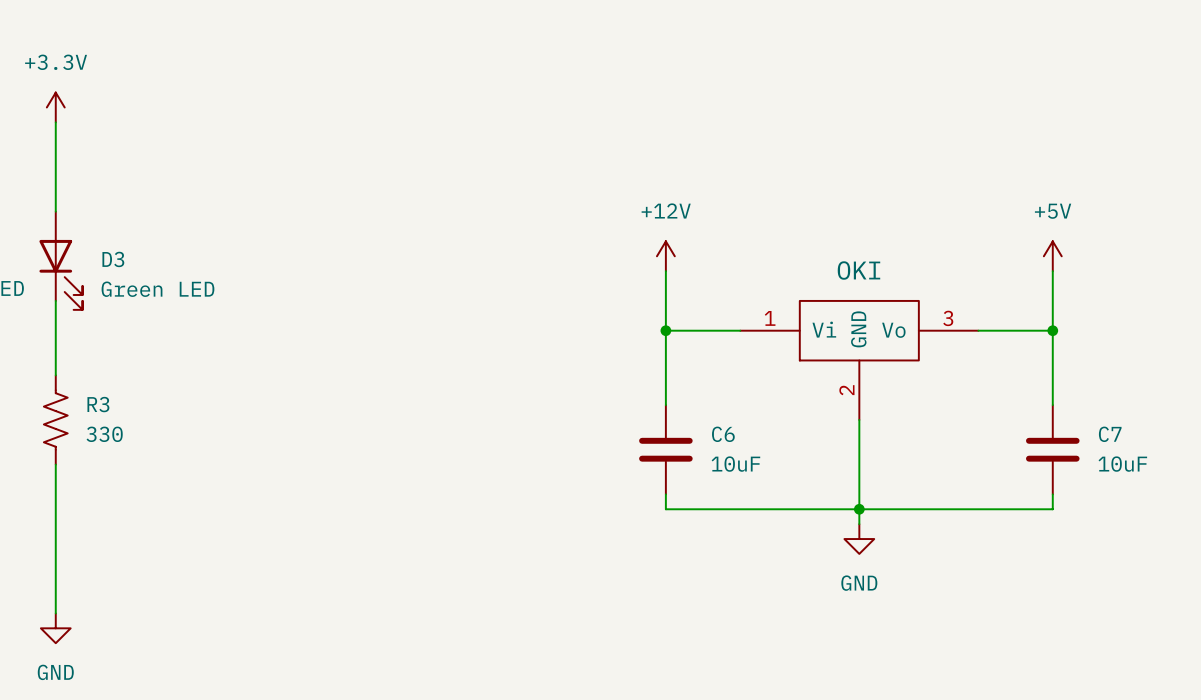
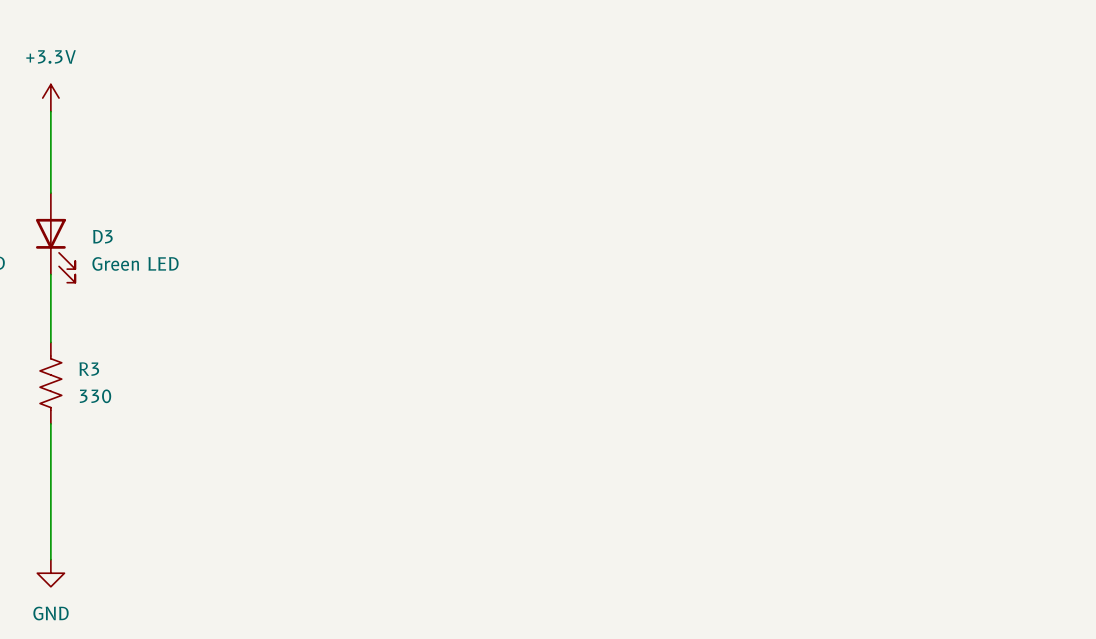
power symbol: +12V (665, 256) -> none
power symbol: +5V (1052, 256) -> none
wire: (665, 271) (665, 405) -> none
wire: (1052, 271) (1052, 405) -> none
wire: (665, 330) (740, 330) -> none
junction: (665, 330) -> none
wire: (978, 330) (1052, 330) -> none
junction: (1052, 330) -> none
part: OKI (859, 360) -> none
wire: (859, 419) (859, 524) -> none
C6: 10uF (665, 449) -> none
C7: 10uF (1052, 449) -> none
wire: (665, 494) (665, 509) (1052, 509) (1052, 494) -> none
junction: (859, 509) -> none
power symbol: GND (859, 539) -> none

